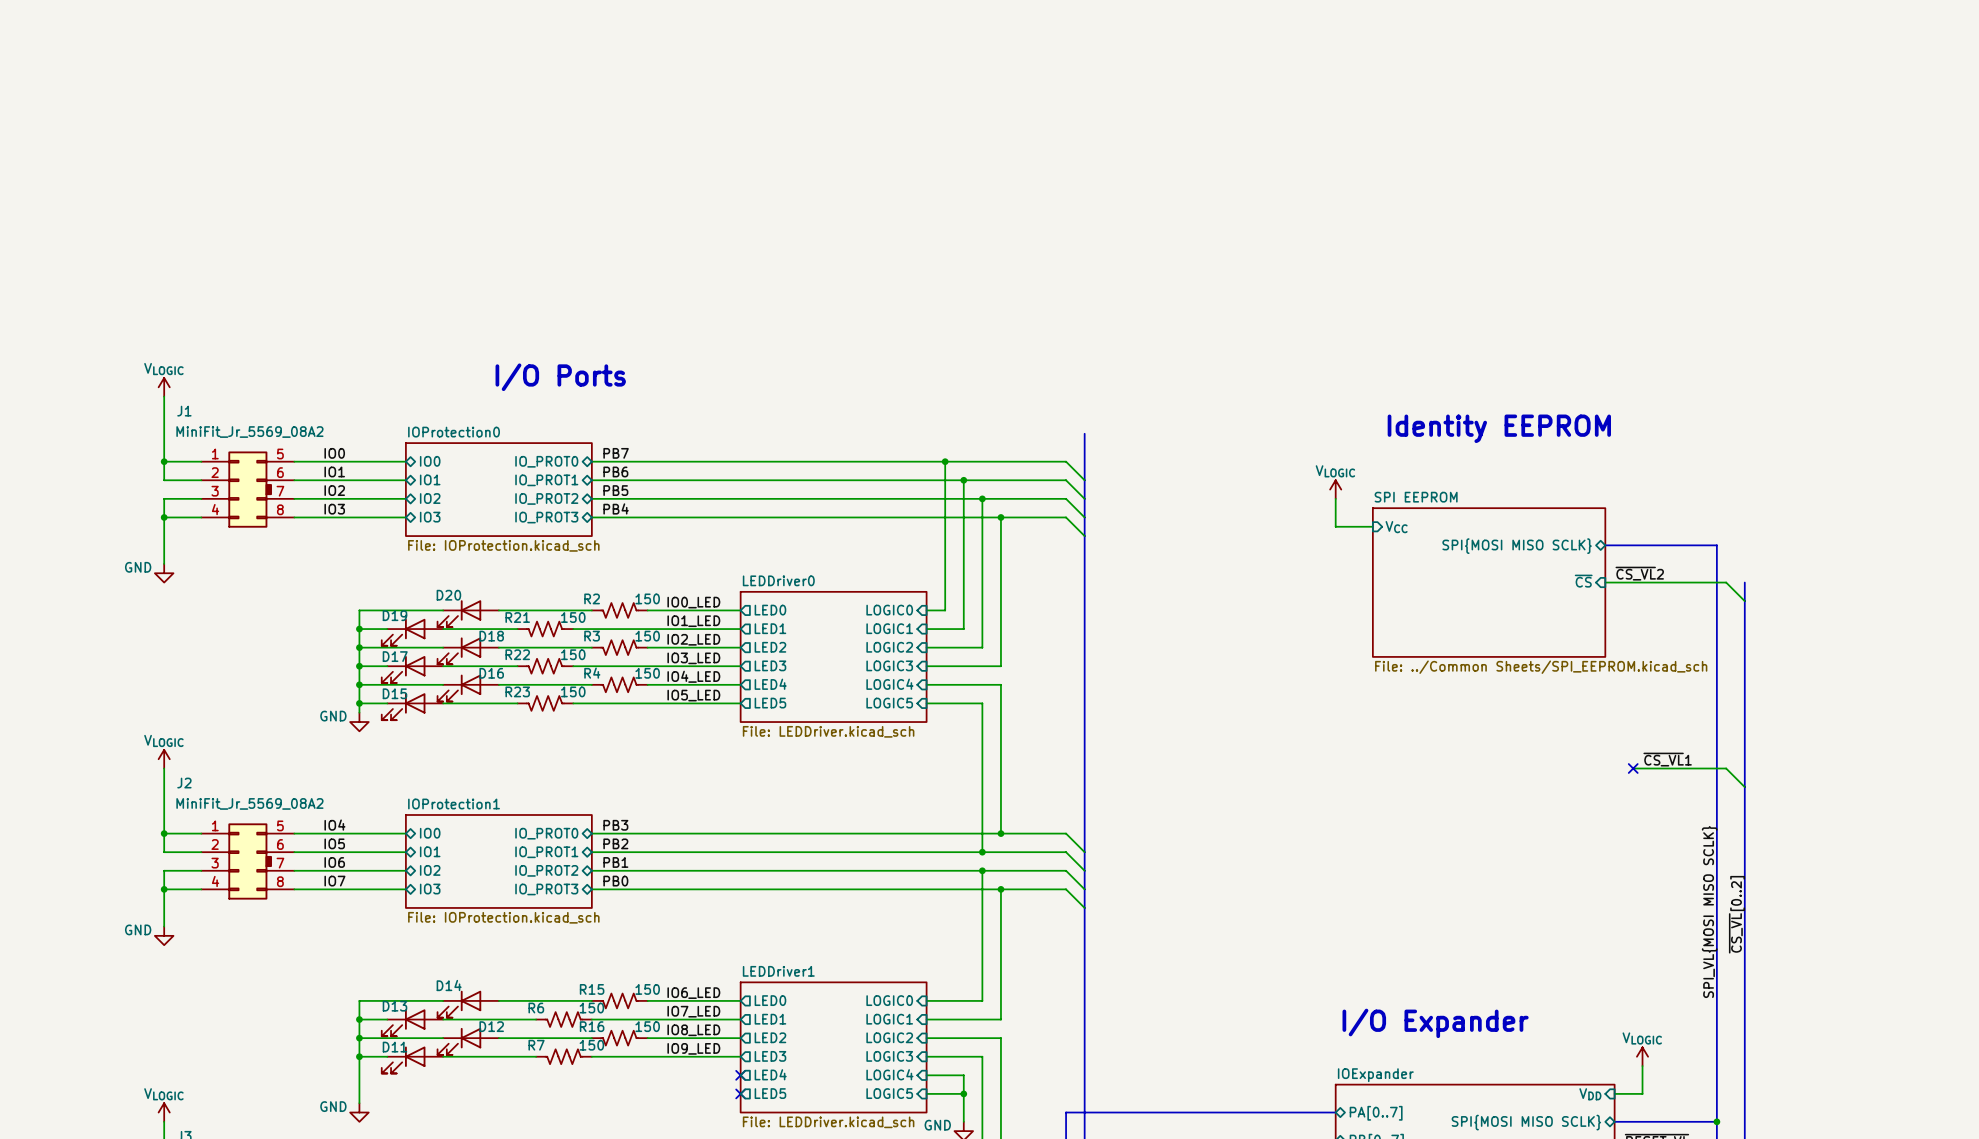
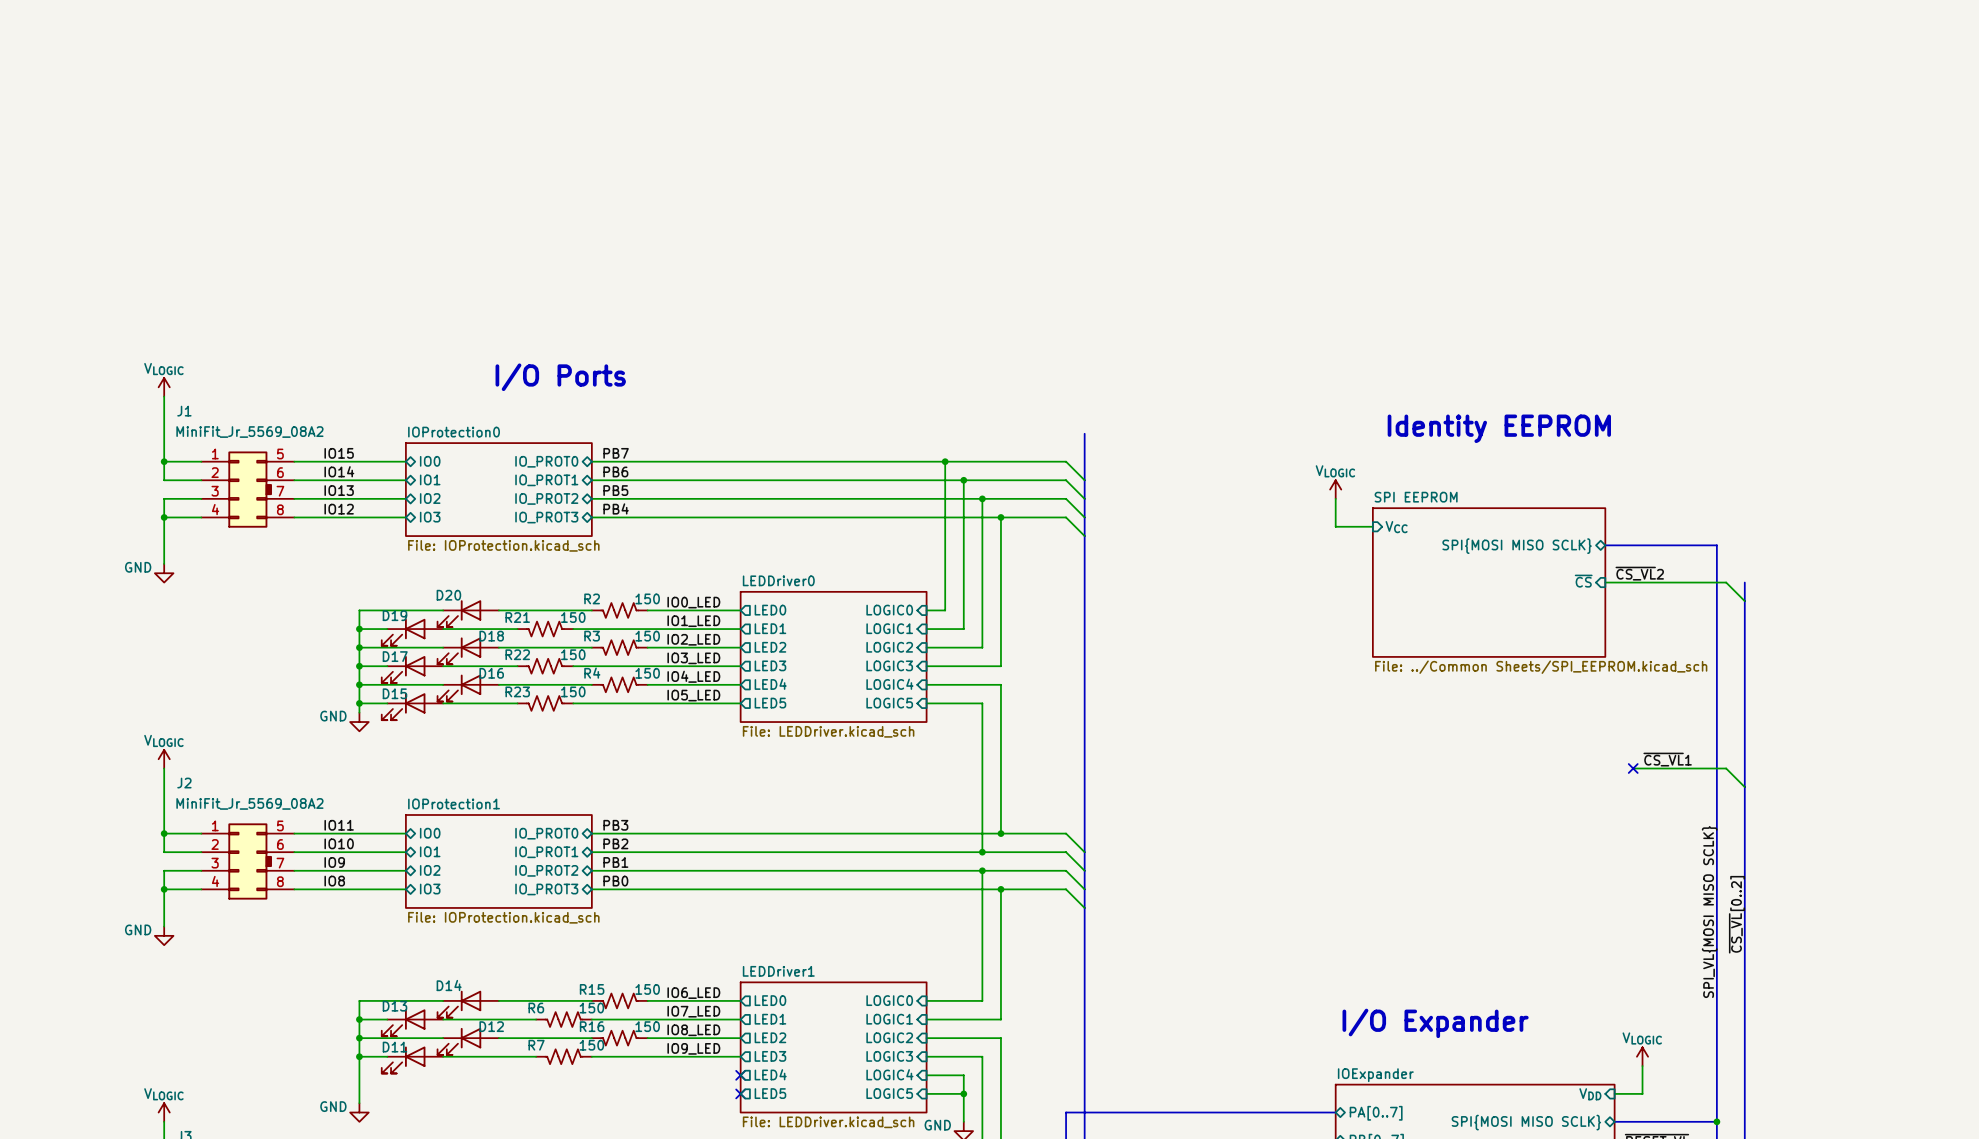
label: IO0 (334, 453) -> IO15 (339, 453)
label: IO1 (334, 471) -> IO14 (339, 471)
label: IO2 (334, 490) -> IO13 (339, 490)
label: IO3 (334, 509) -> IO12 (339, 509)
label: IO4 (334, 825) -> IO11 (339, 825)
label: IO5 (334, 843) -> IO10 (339, 843)
label: IO6 (334, 862) -> IO9 (334, 862)
label: IO7 (334, 881) -> IO8 (334, 881)

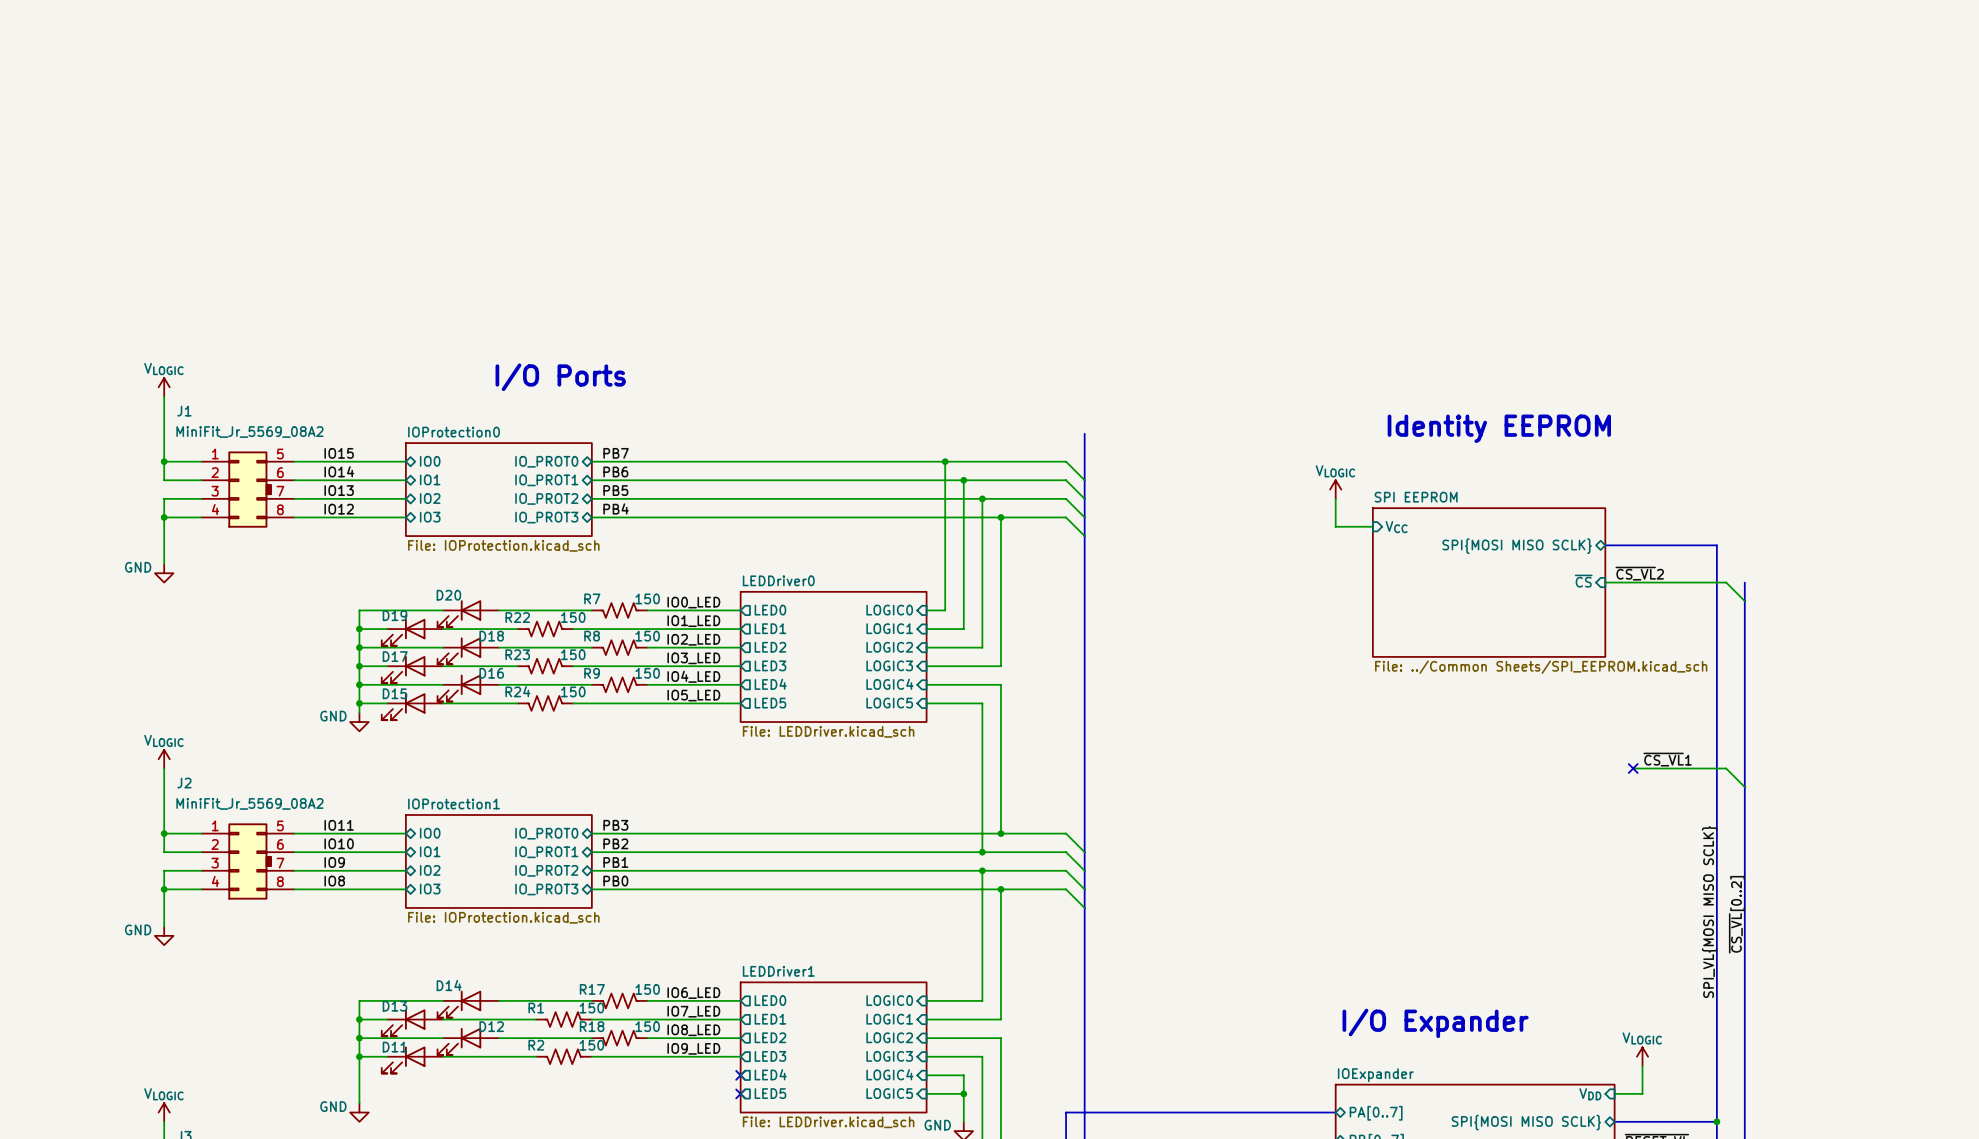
R2 name: R2 (592, 598) -> R7 (592, 598)
R21 name: R21 (517, 617) -> R22 (517, 617)
R3 name: R3 (592, 636) -> R8 (592, 636)
R22 name: R22 (517, 654) -> R23 (517, 654)
R4 name: R4 (592, 673) -> R9 (592, 673)
R23 name: R23 (517, 691) -> R24 (517, 691)
R15 name: R15 (592, 989) -> R17 (592, 989)
R6 name: R6 (536, 1008) -> R1 (536, 1008)
R16 name: R16 (592, 1026) -> R18 (592, 1026)
R7 name: R7 (536, 1045) -> R2 (536, 1045)

